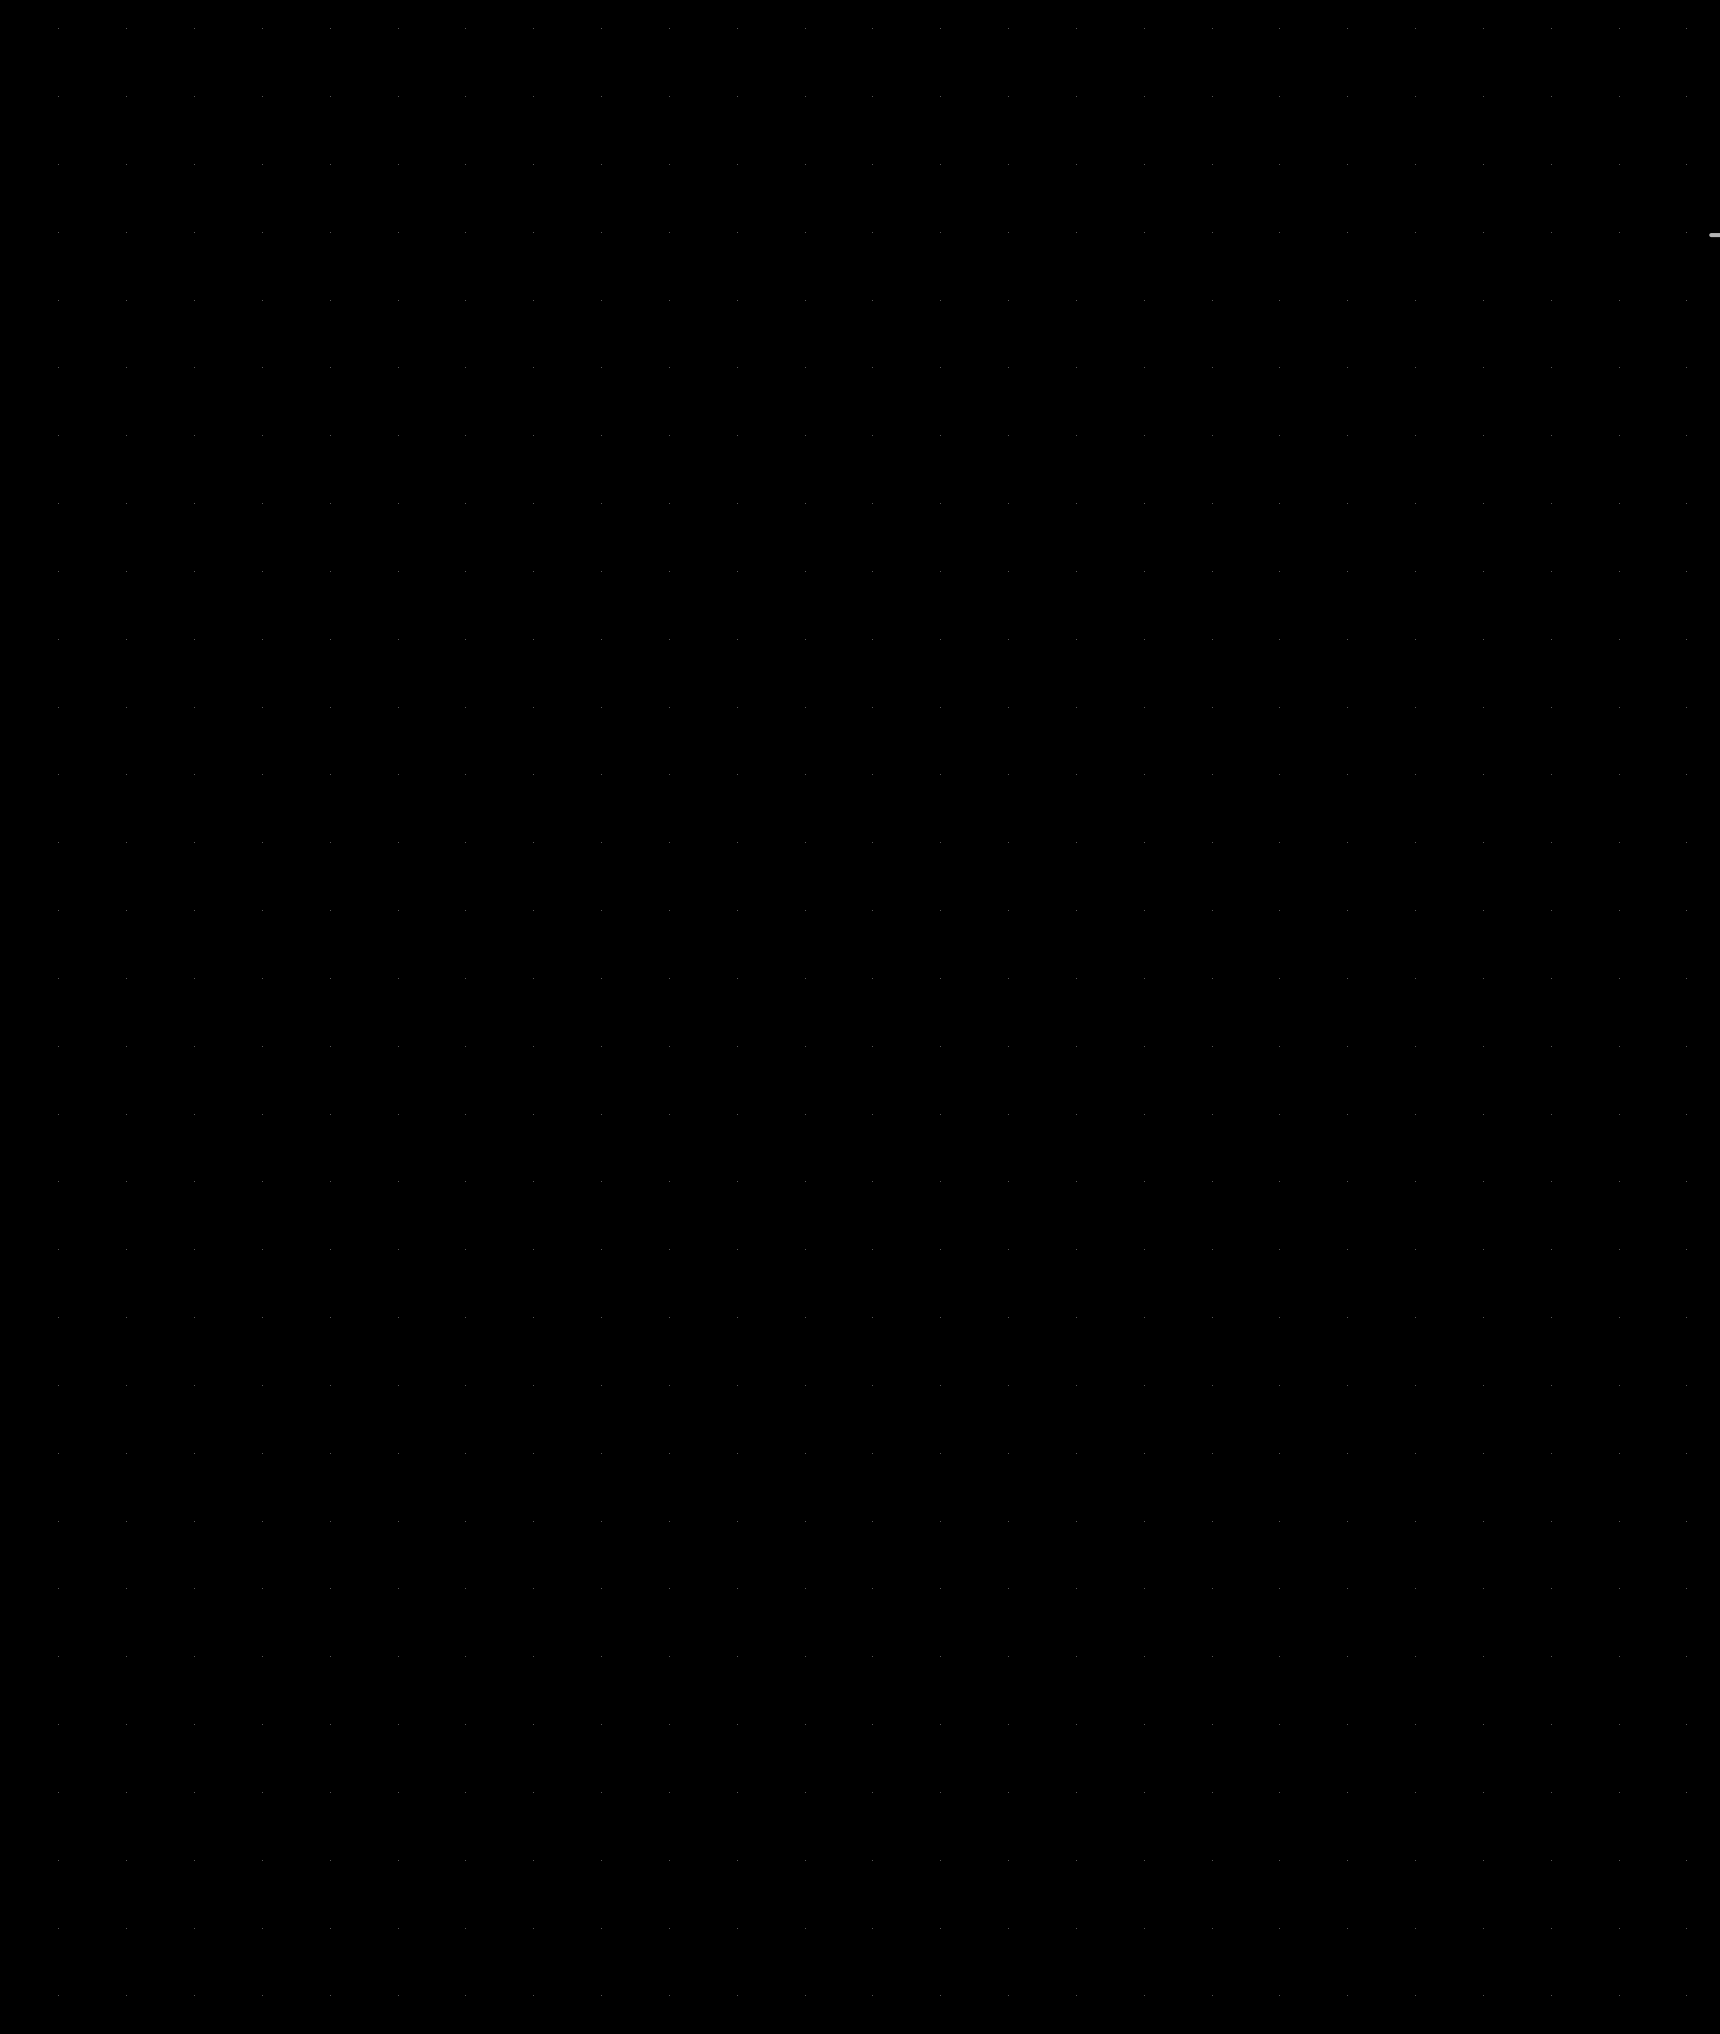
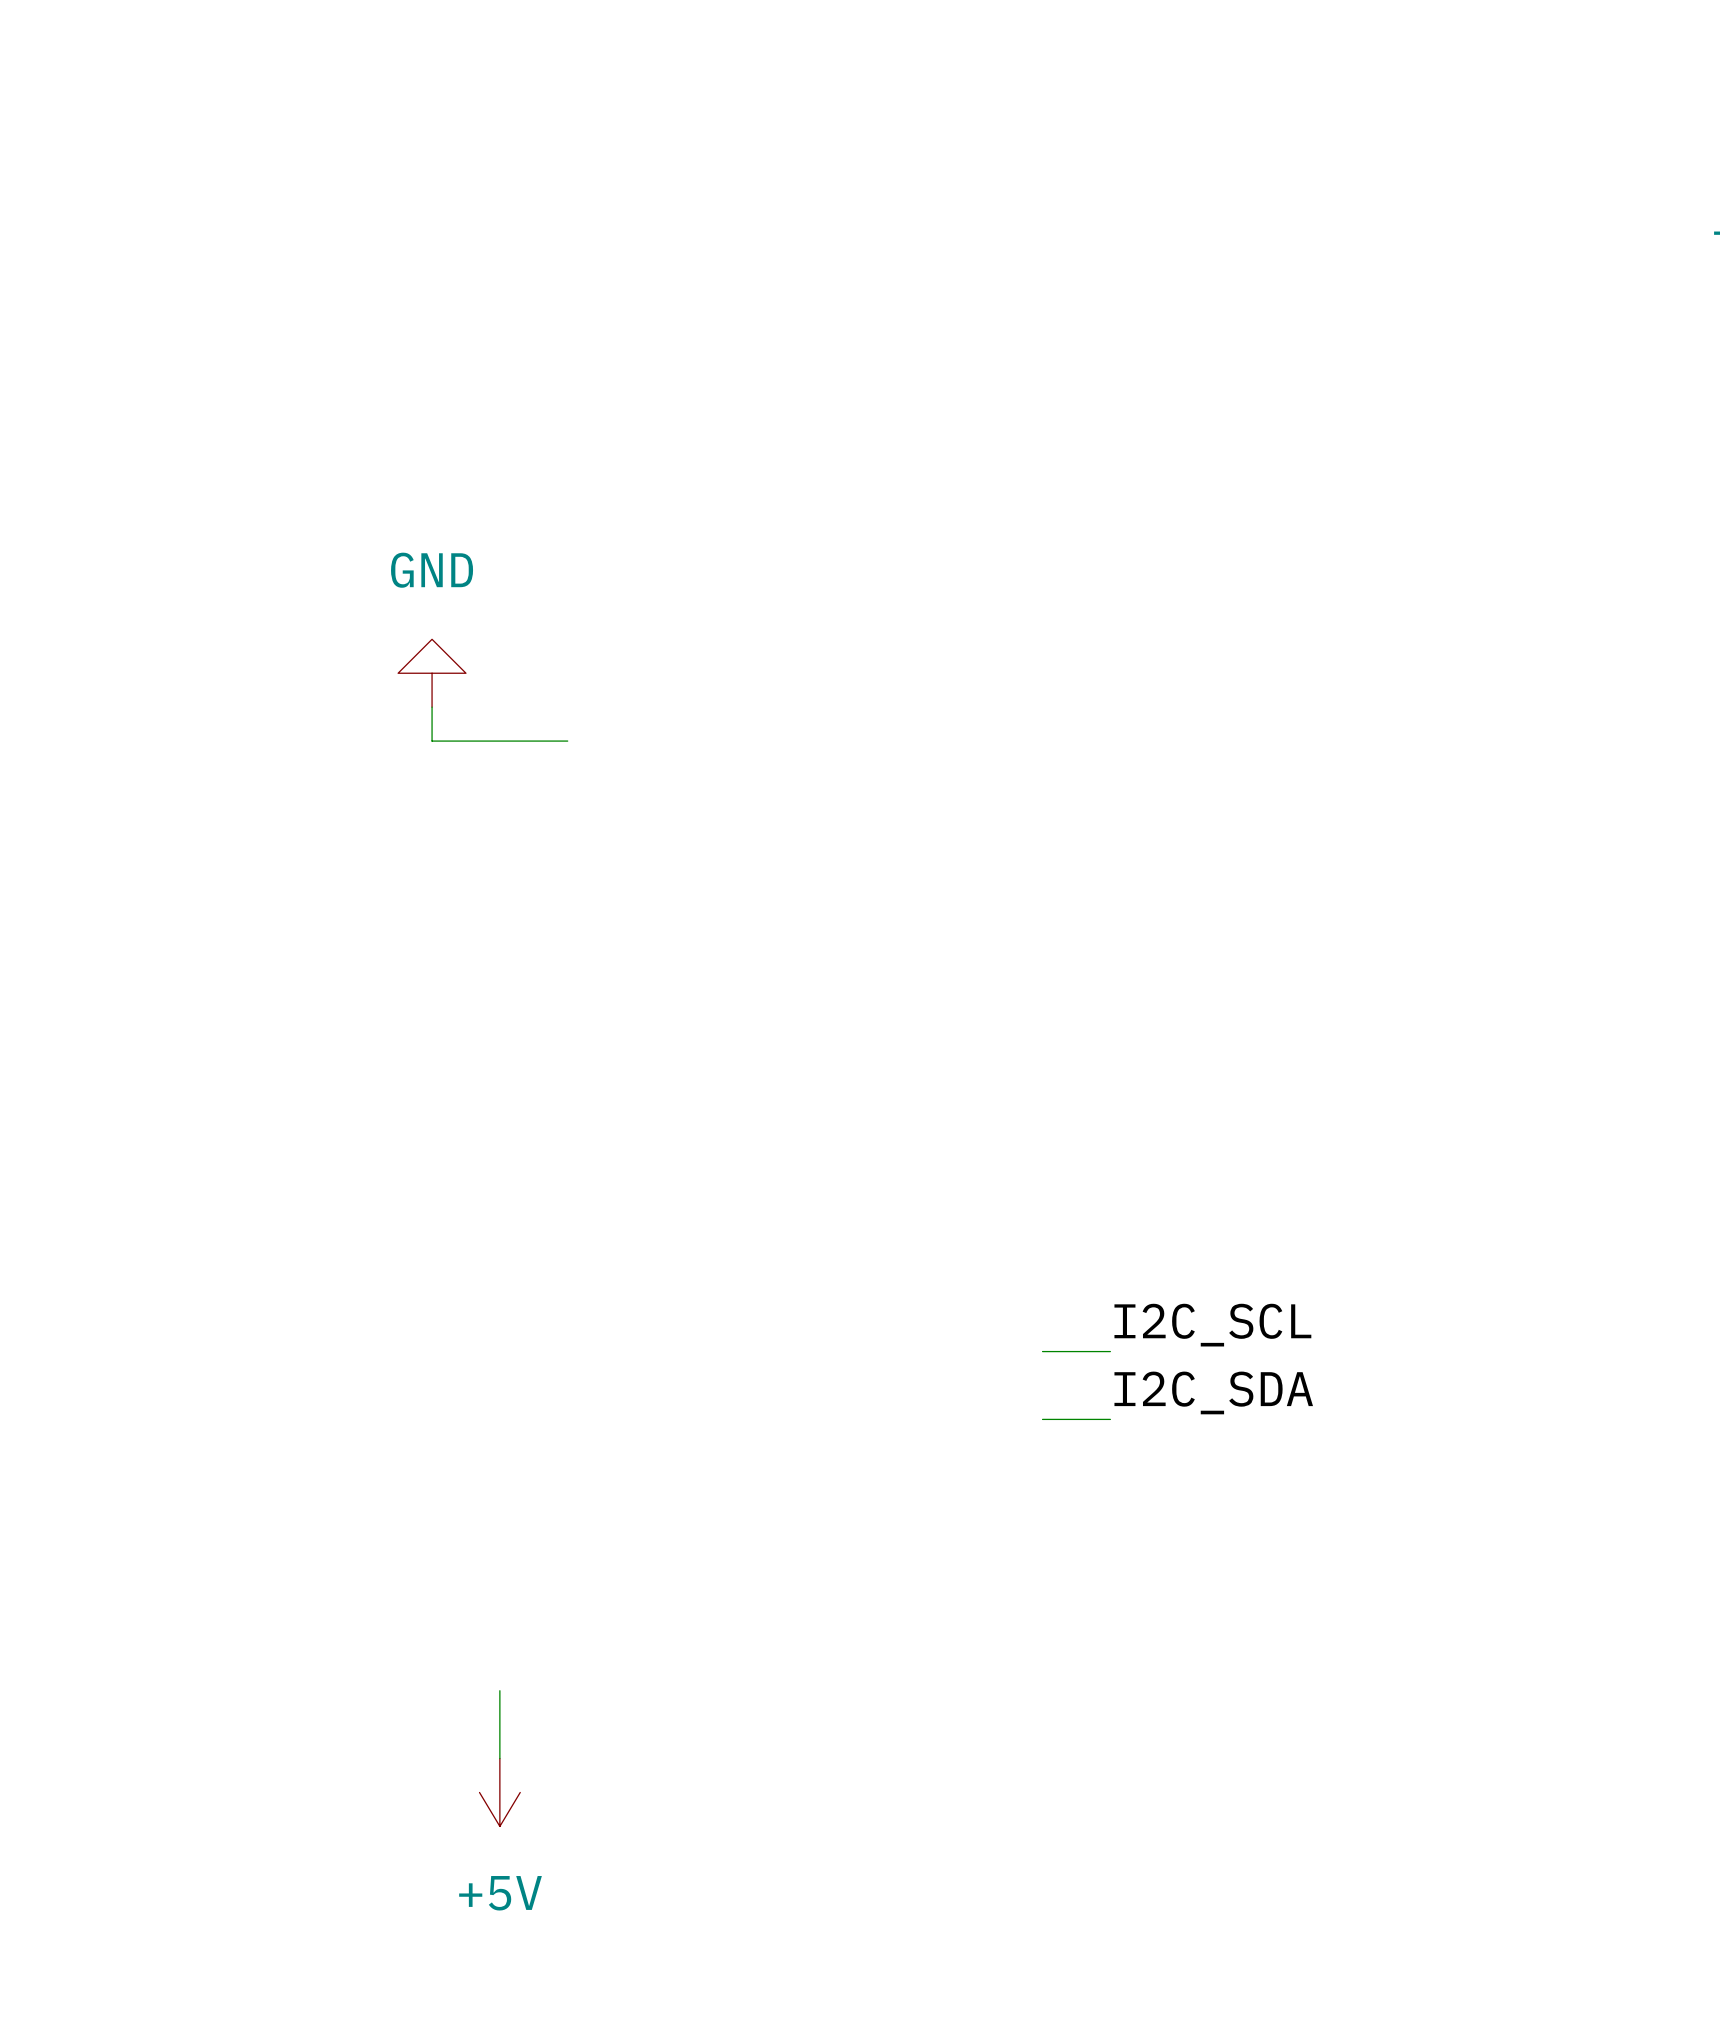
power symbol: none -> GND (432, 673)
wire: none -> (432, 707) (432, 741) (567, 741)
label: none -> I2C_SCL (1212, 1325)
wire: none -> (1042, 1351) (1110, 1351)
label: none -> I2C_SDA (1213, 1392)
wire: none -> (1042, 1419) (1110, 1419)
wire: none -> (499, 1690) (499, 1758)
power symbol: none -> +5V (499, 1792)

